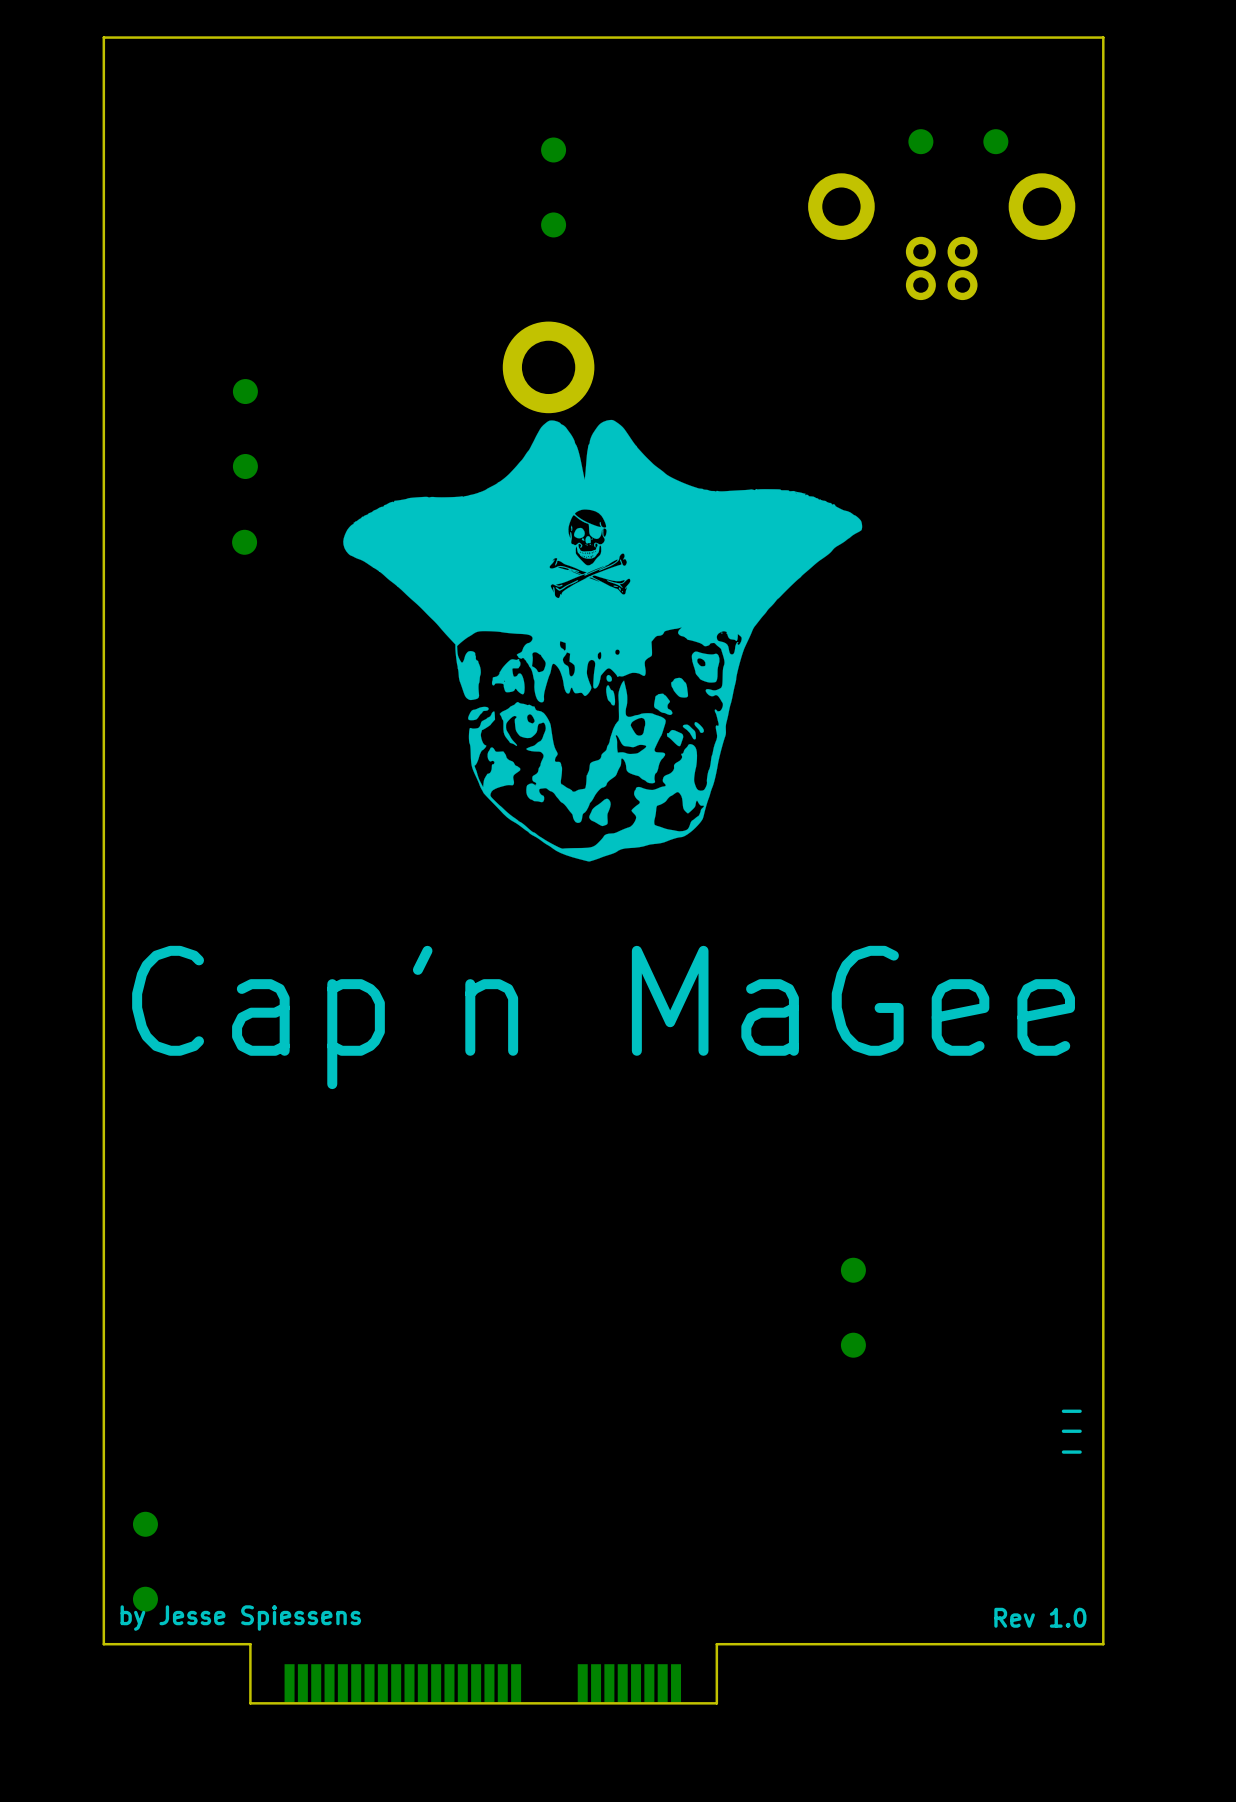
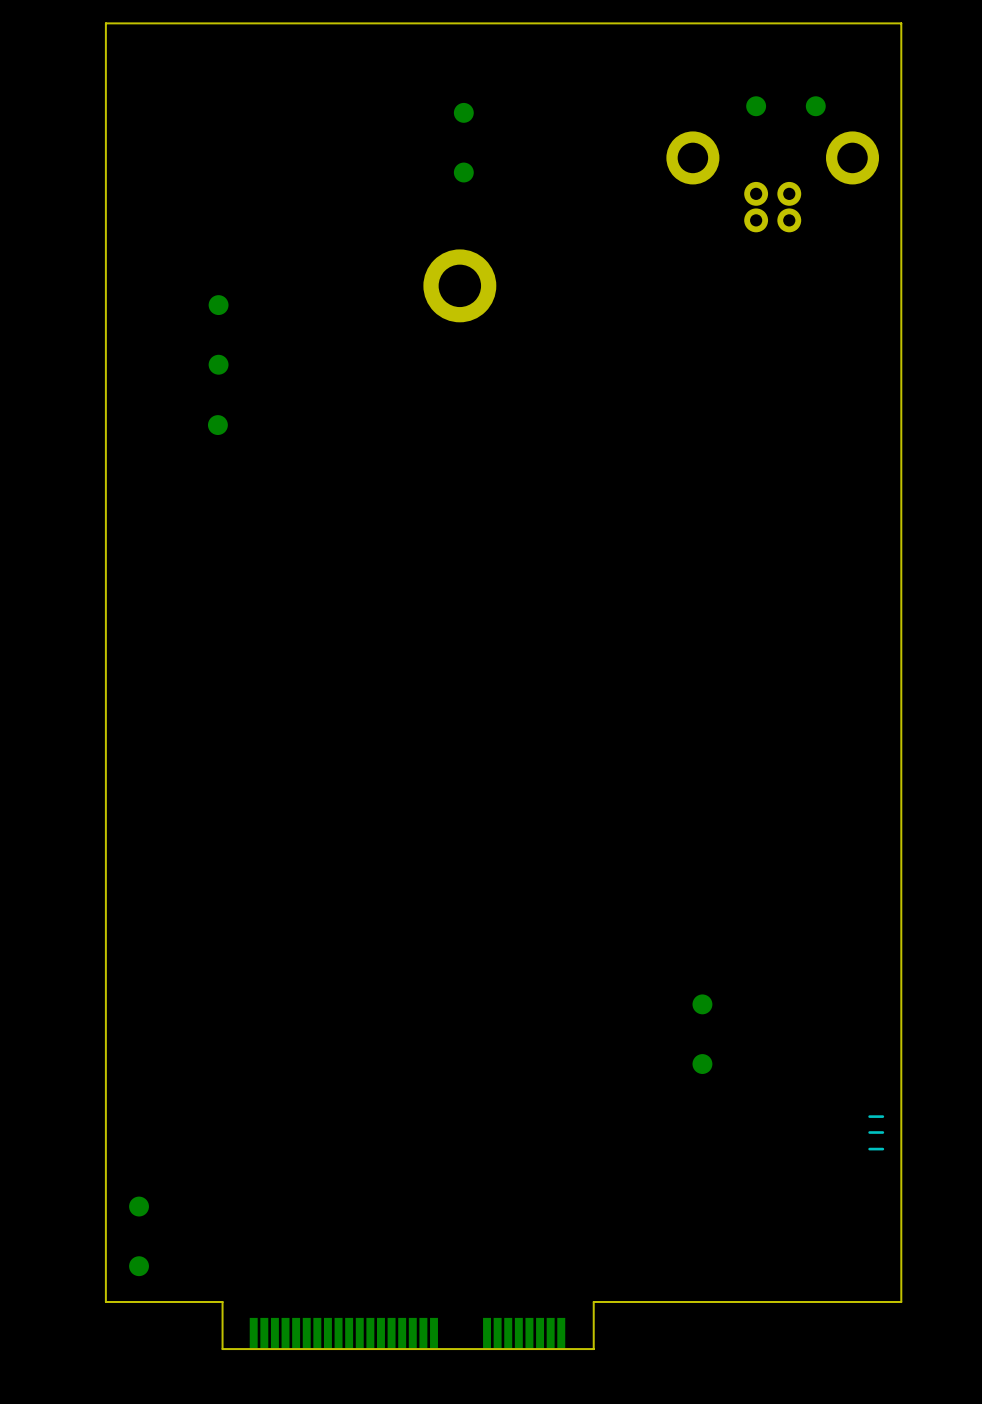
drawing: [343, 419, 863, 862] -> none
text: Cap'n MaGee (603, 1017) -> none
text: Rev 1.0 (1040, 1617) -> none
text: by Jesse Spiessens (240, 1618) -> none

